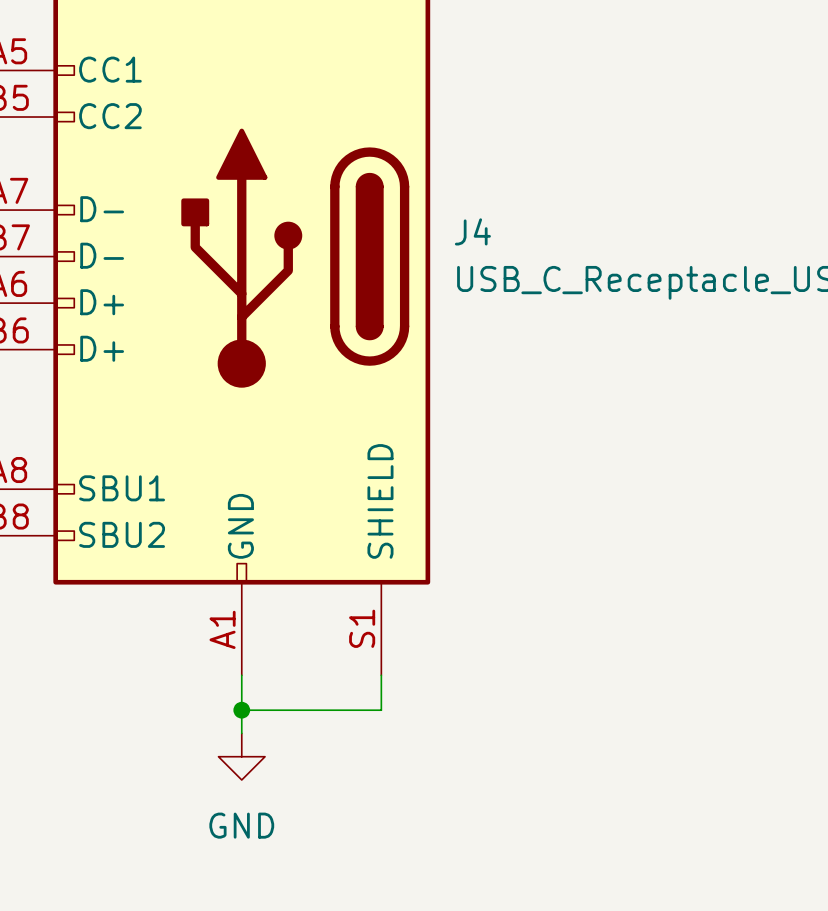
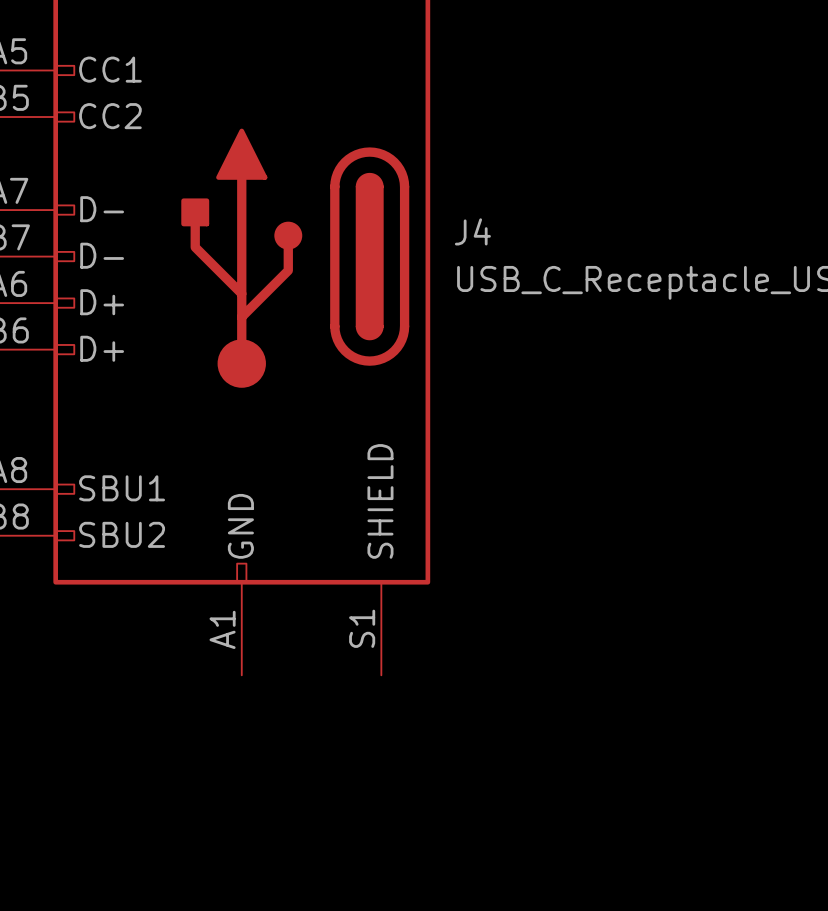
wire: (241, 675) (241, 733) -> none
wire: (381, 675) (381, 710) (241, 710) -> none
junction: (241, 710) -> none
power symbol: GND (241, 756) -> none

